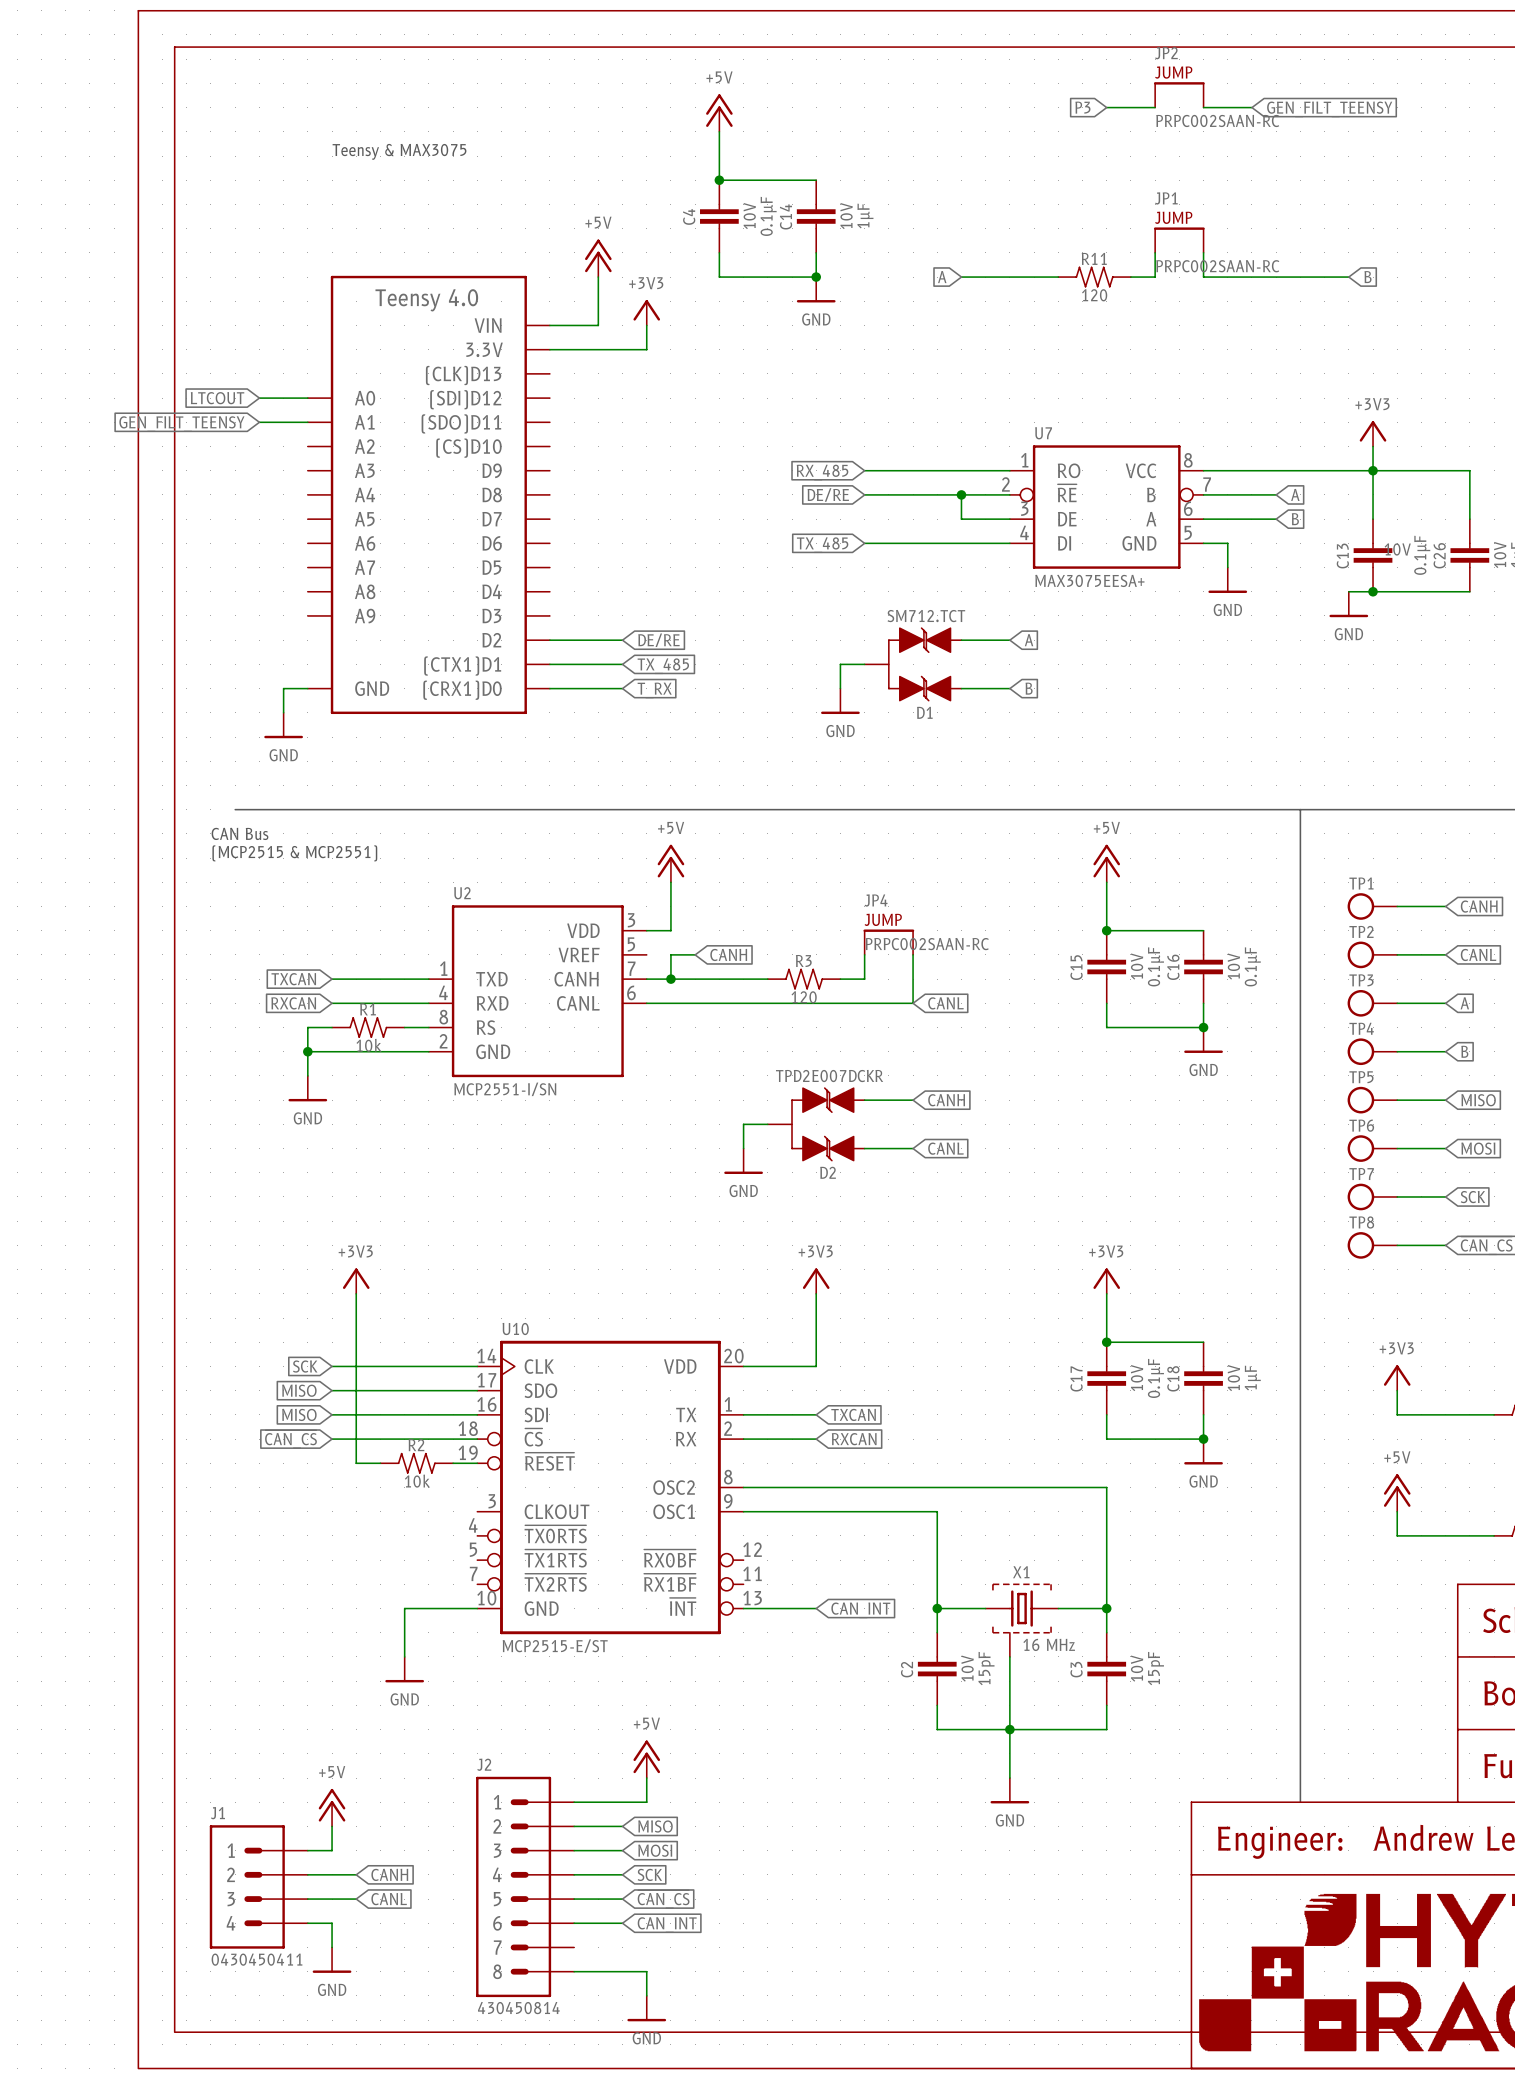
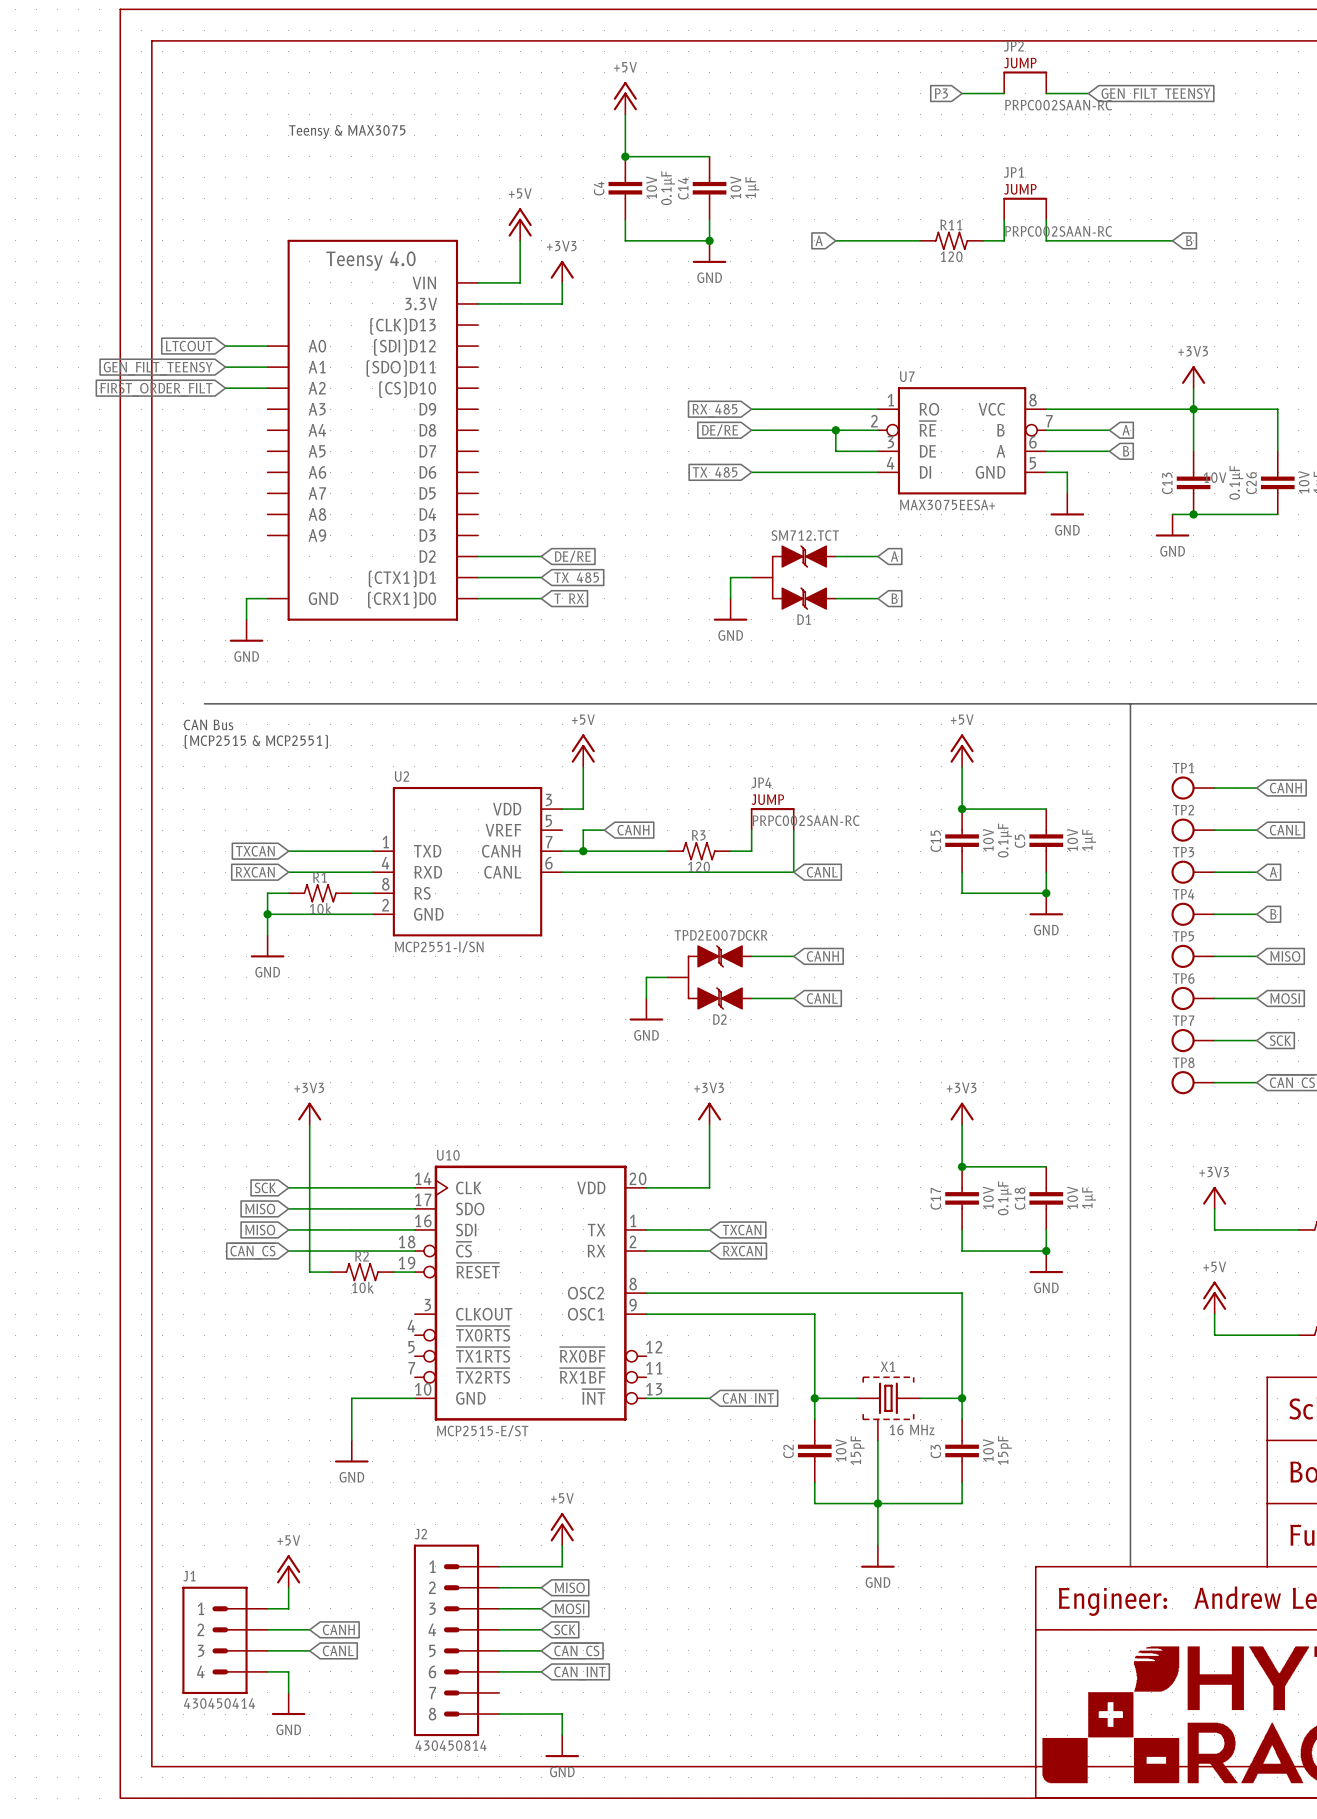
wire: none -> (225, 388) (267, 388)
global label: none -> FIRST_ORDER_FILT (156, 389)
C16 text: 0.1µF (1252, 966) -> 1µF (1089, 840)
C16 name: C16 (1173, 967) -> C5 (1020, 841)
J1 text: 0430450411 (257, 1959) -> 430450414 (219, 1703)

